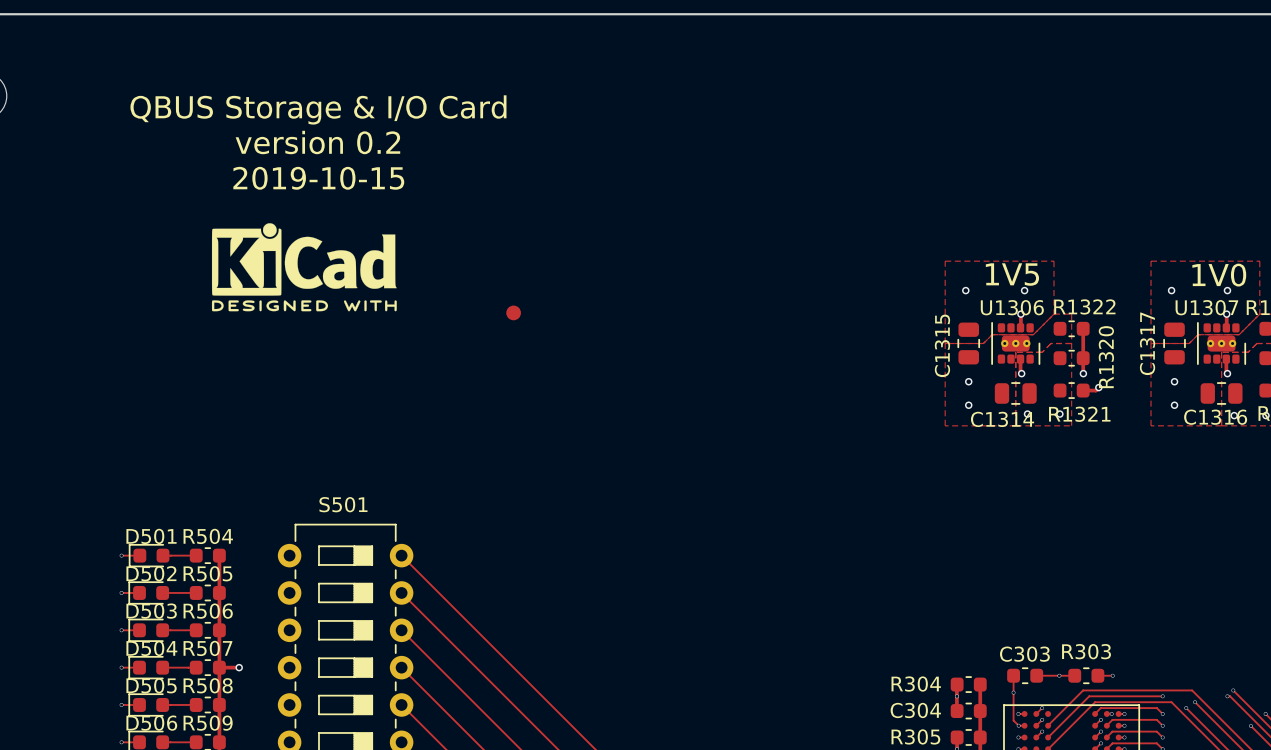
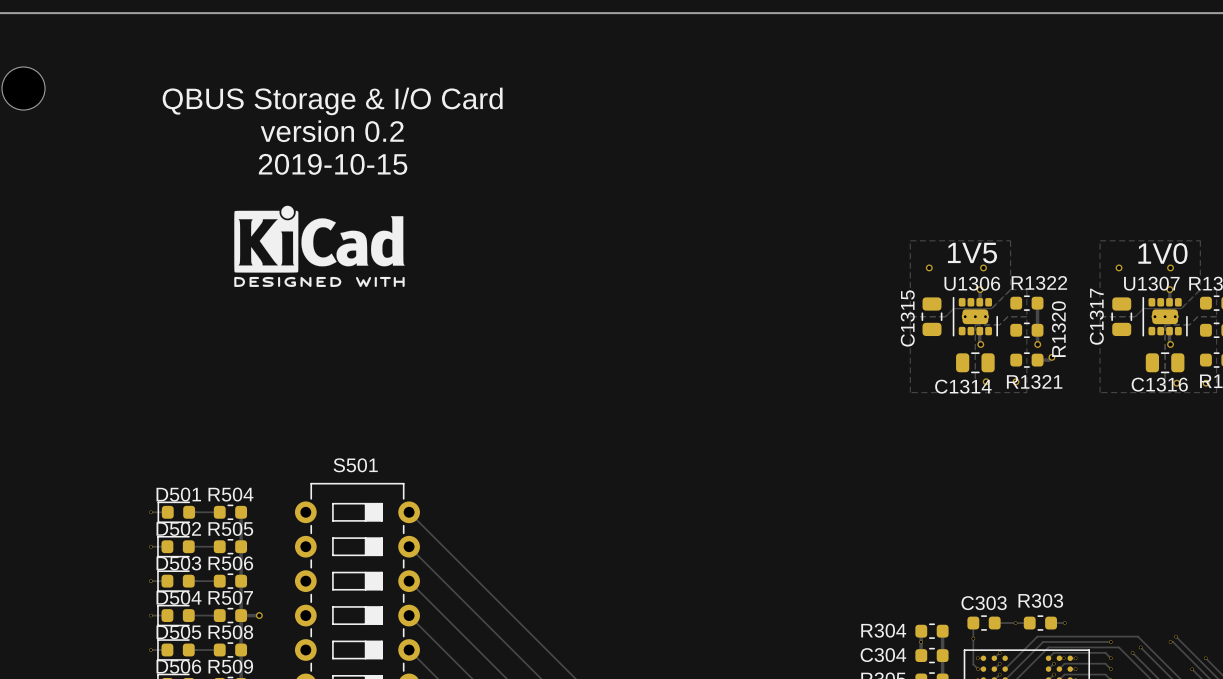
part: (513, 312) -> none
via: (968, 381) -> none
via: (1174, 381) -> none
via: (968, 405) -> none
via: (1174, 405) -> none

